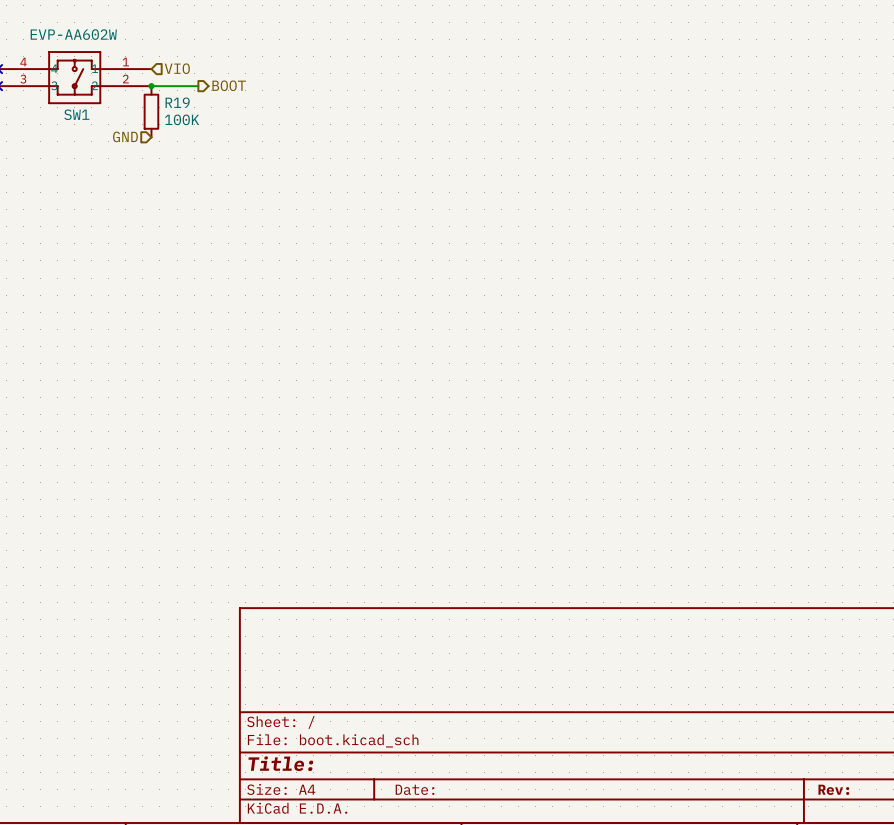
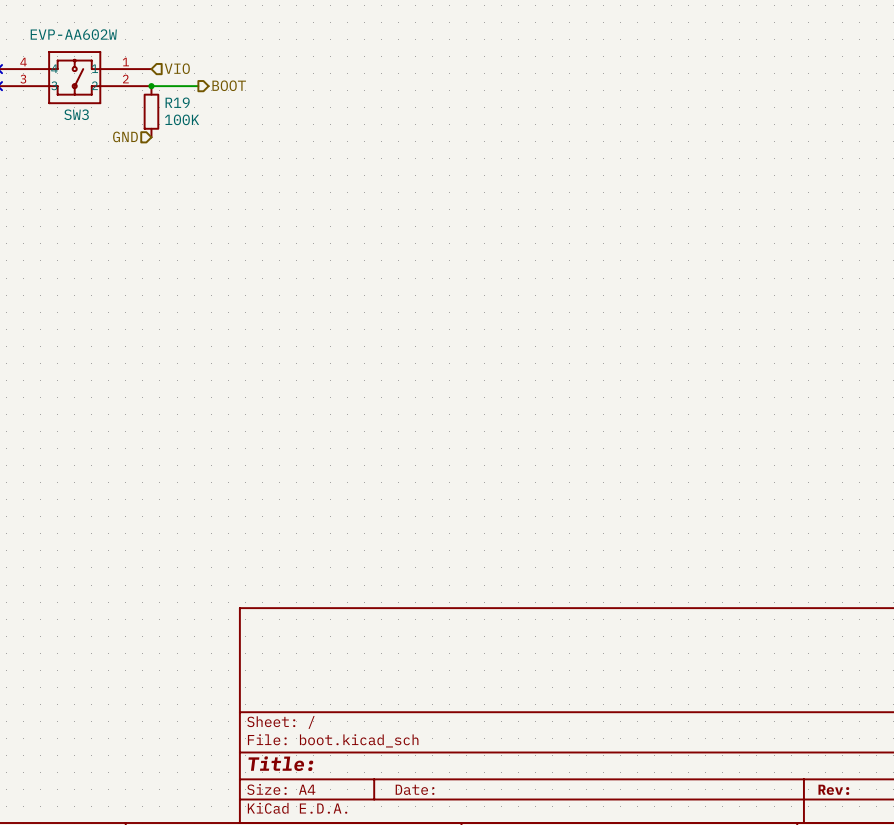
SW1 name: SW1 (76, 114) -> SW3 (76, 114)

